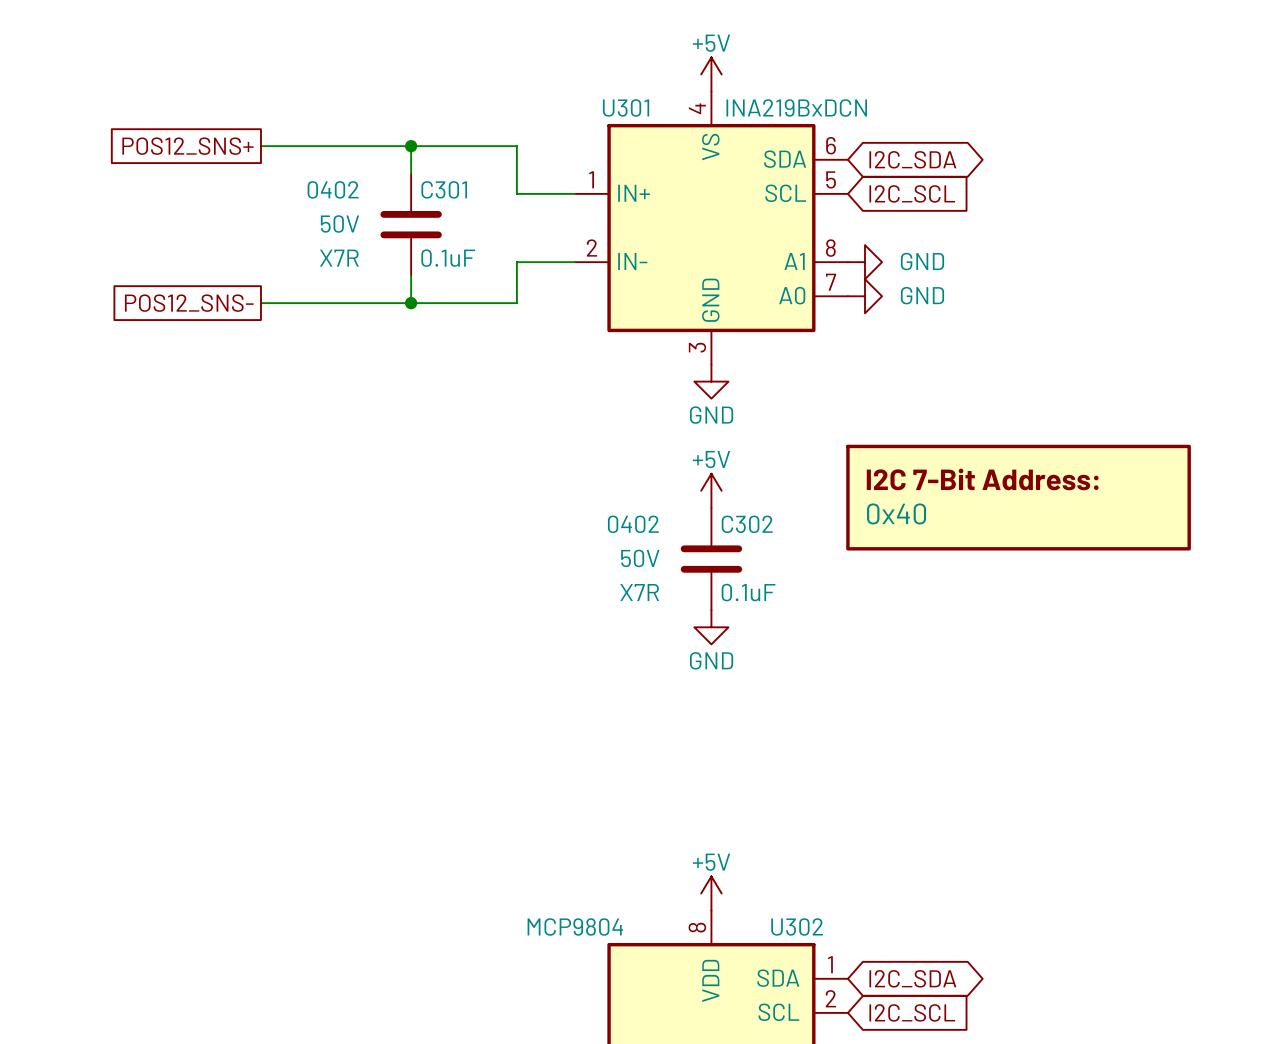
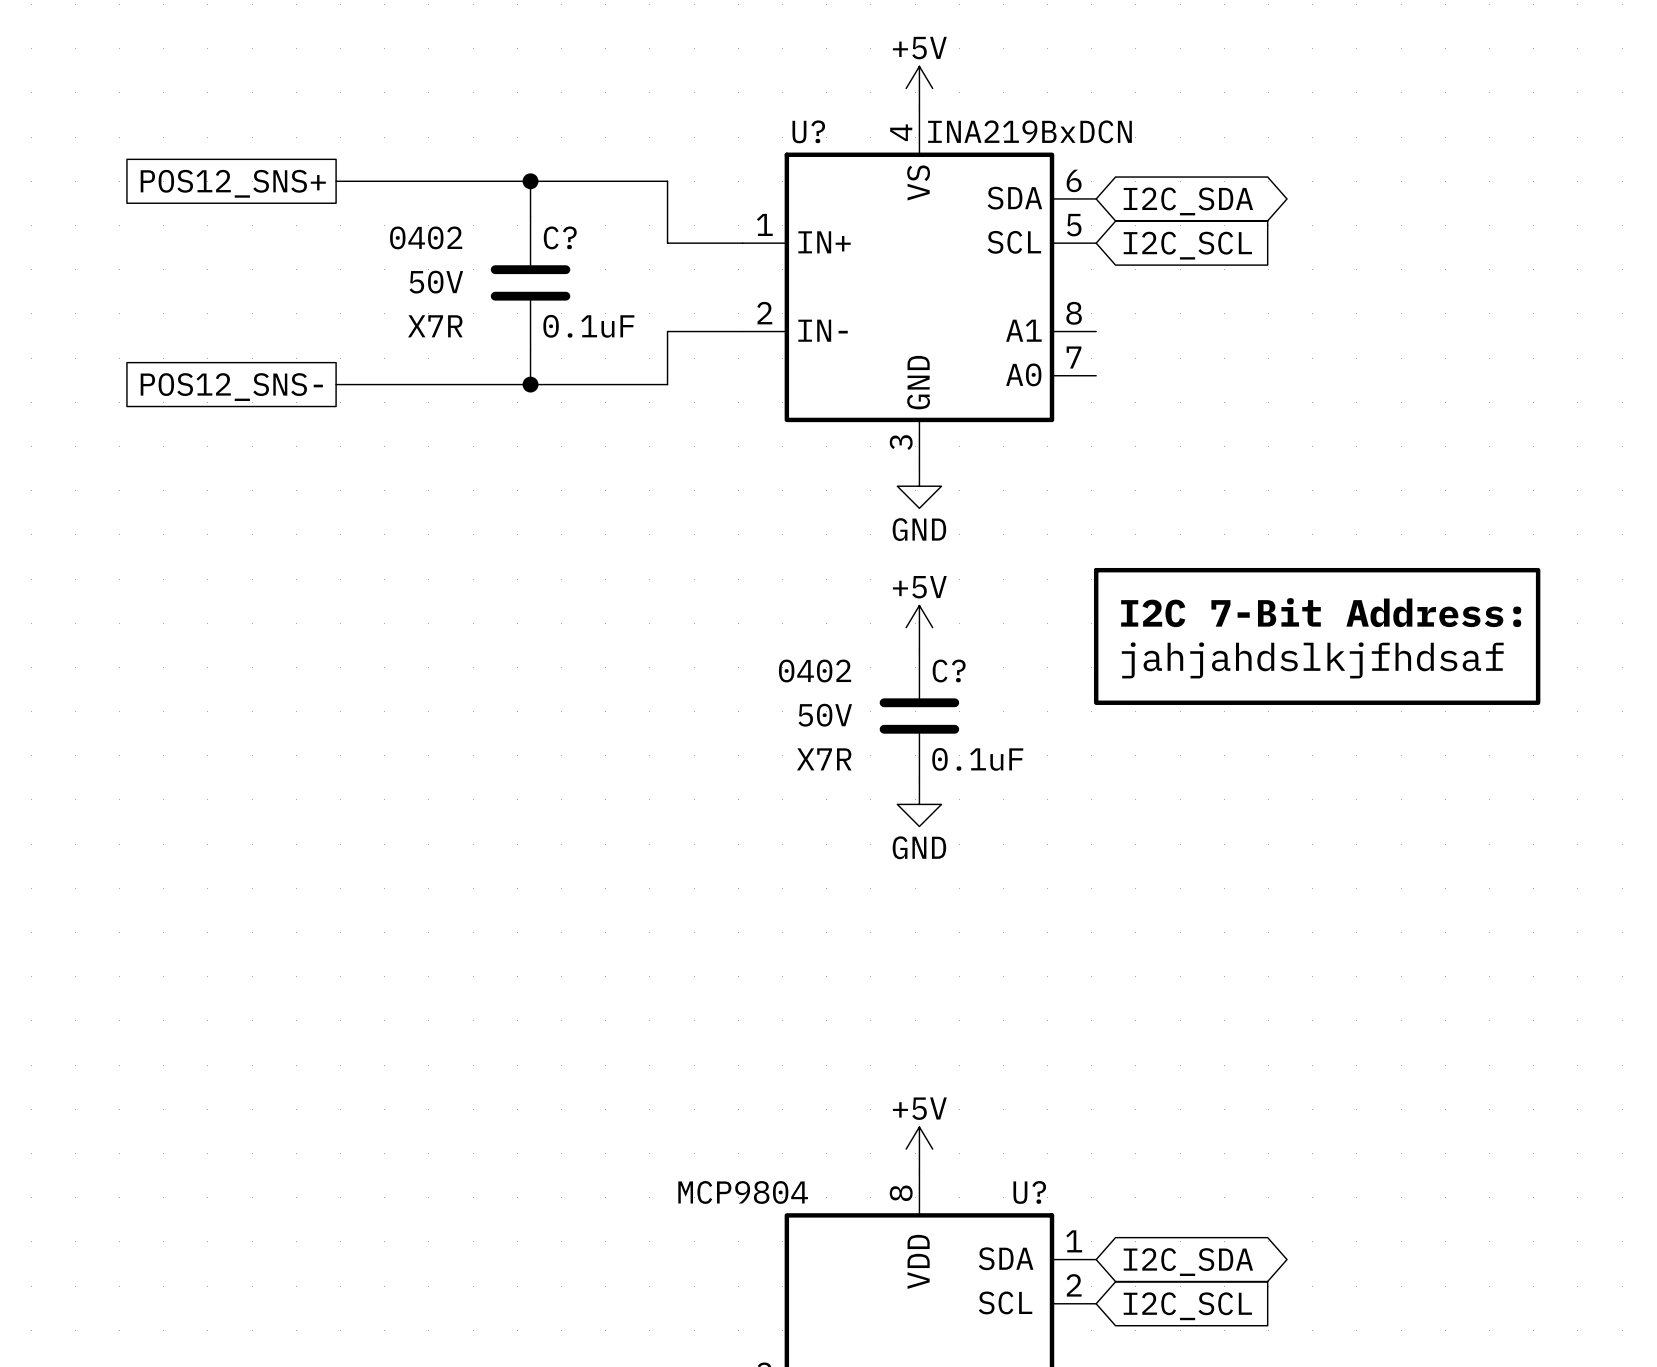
U301 name: U301 (626, 107) -> U? (808, 131)
C301 name: C301 (444, 189) -> C? (560, 237)
power symbol: GND (864, 262) -> none
power symbol: GND (864, 296) -> none
part value: 0x40 (896, 513) -> jahjahdslkjfhdsaf (1312, 660)
C302 name: C302 (747, 524) -> C? (949, 671)
U302 name: U302 (797, 926) -> U? (1029, 1192)

